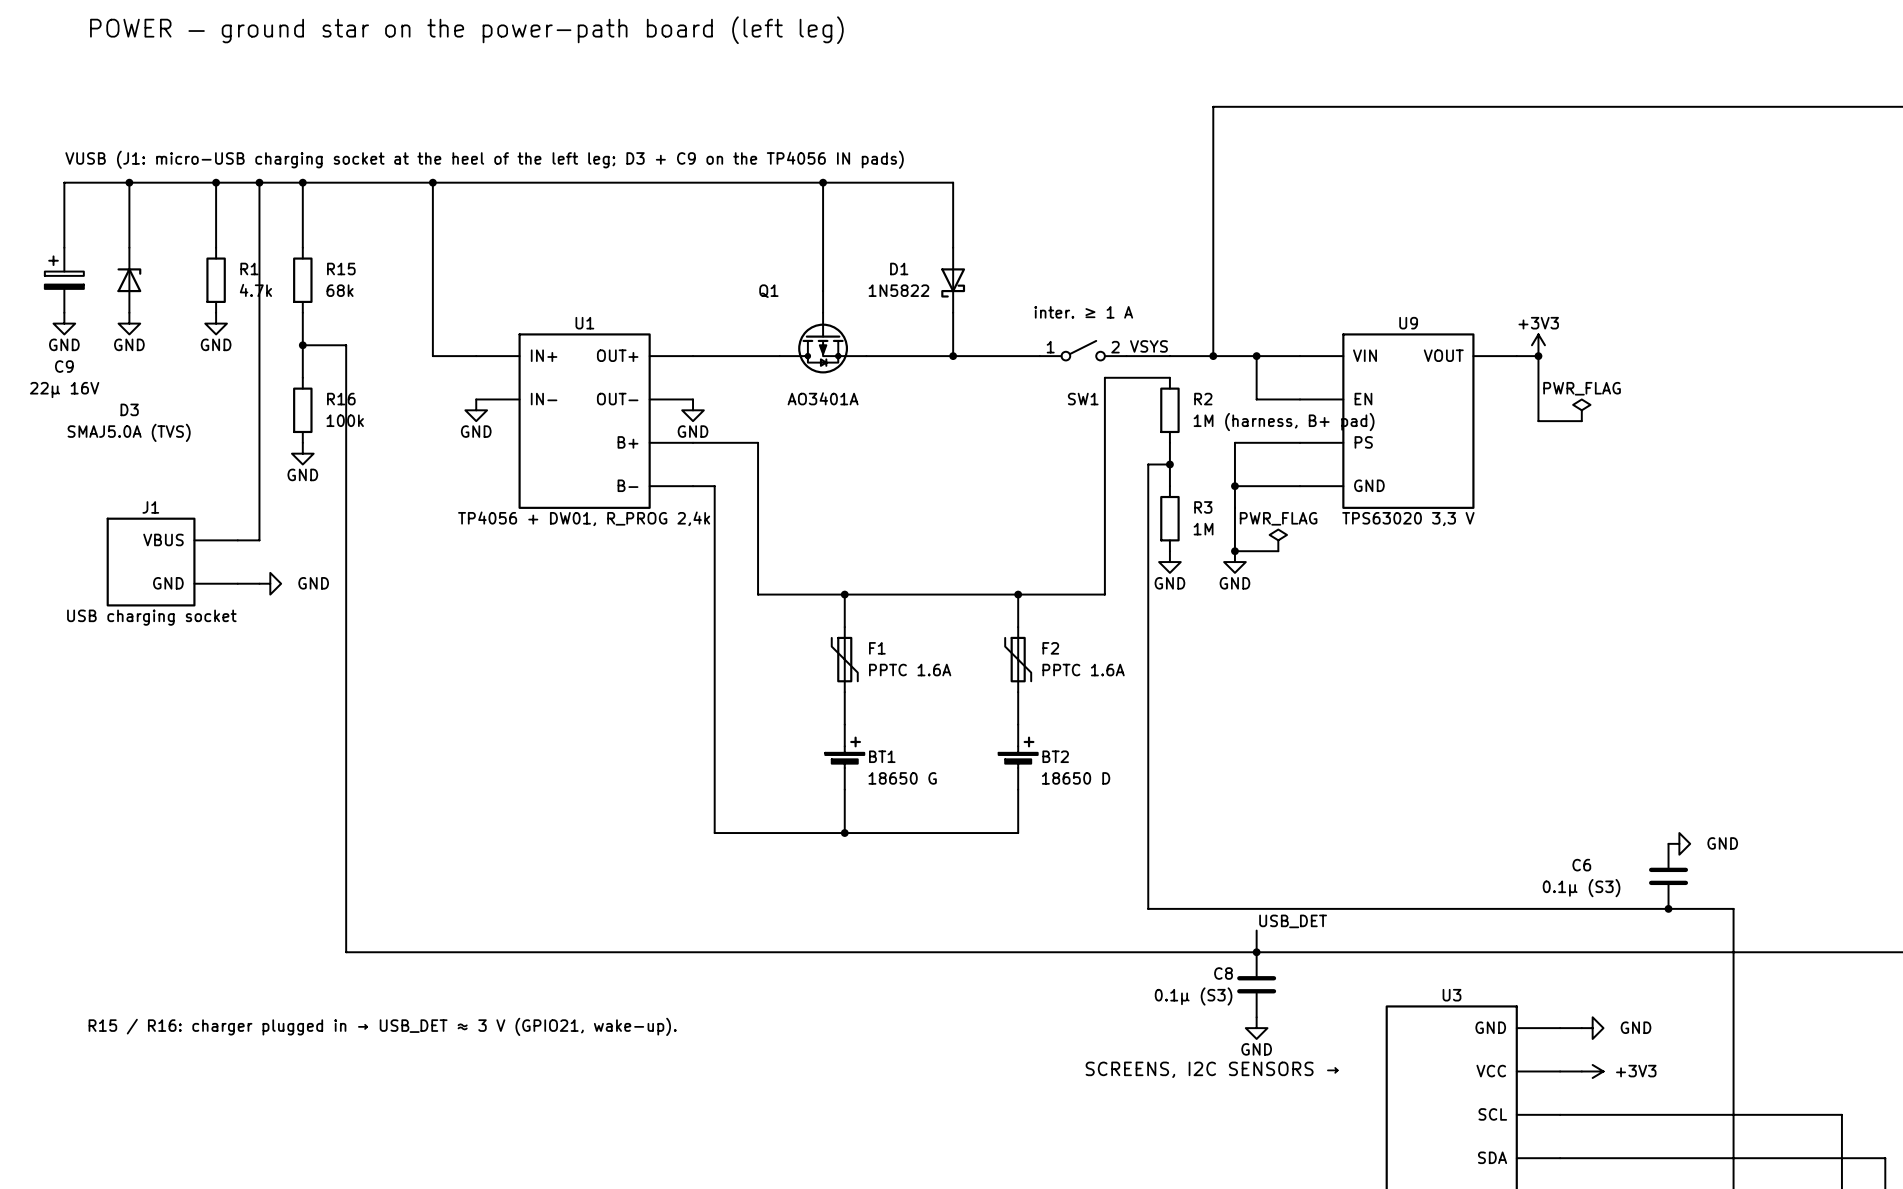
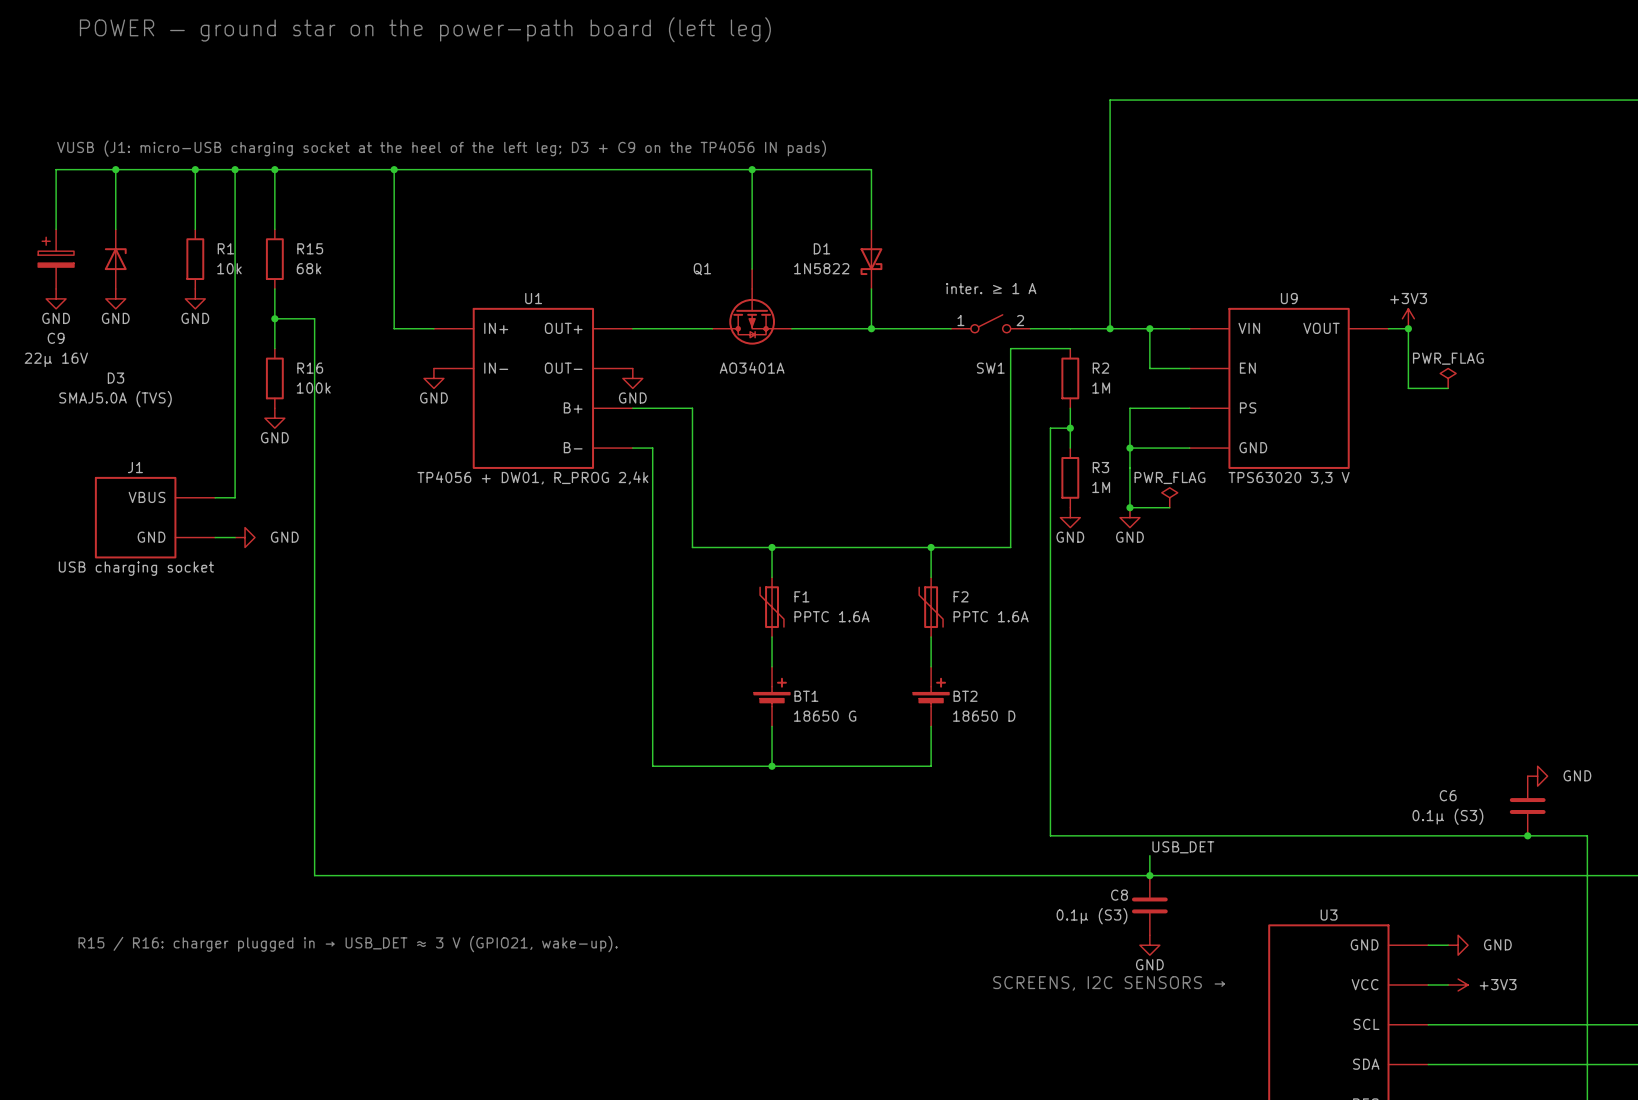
R1 value: 4.7k (255, 290) -> 10k (229, 268)
label: VSYS (1148, 346) -> none
R2 value: 1M (harness, B+ pad) (1284, 422) -> 1M (1101, 388)

